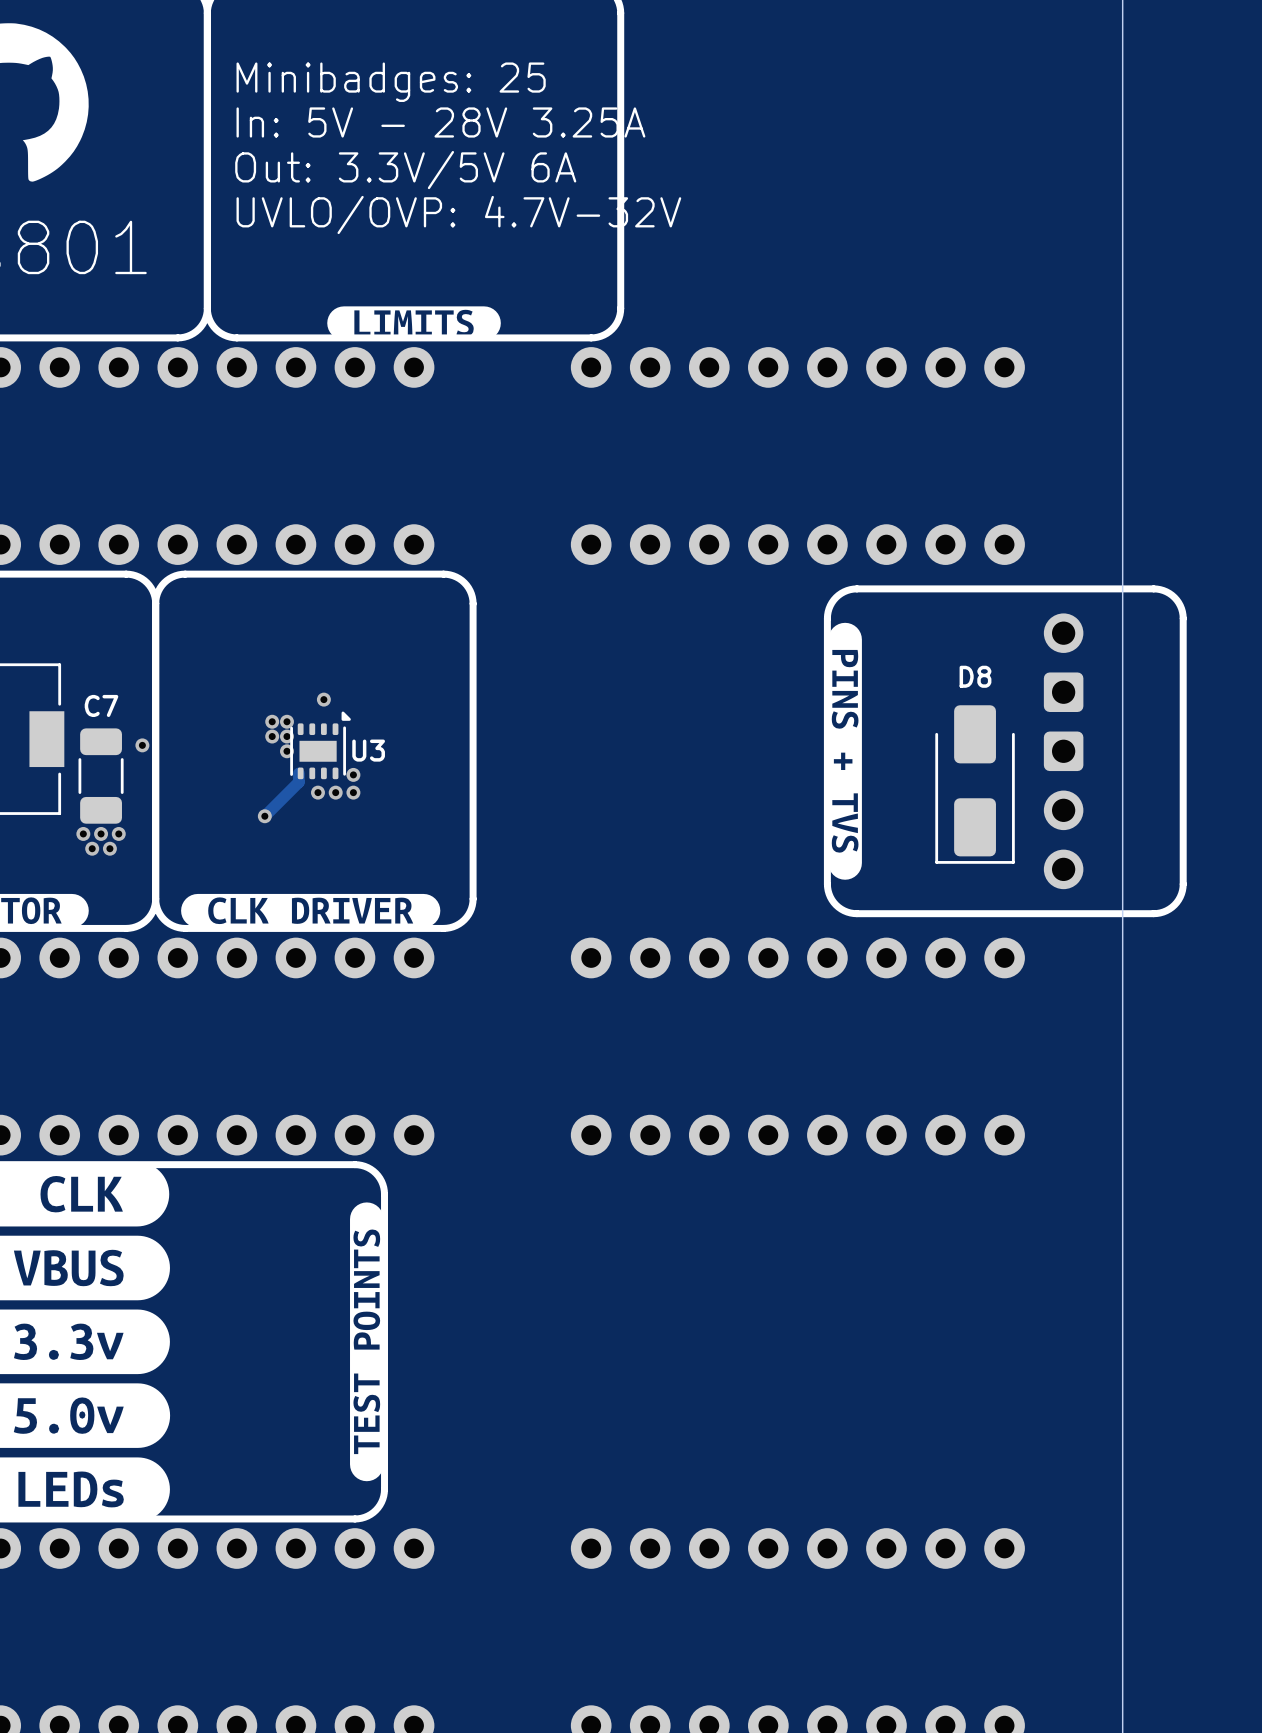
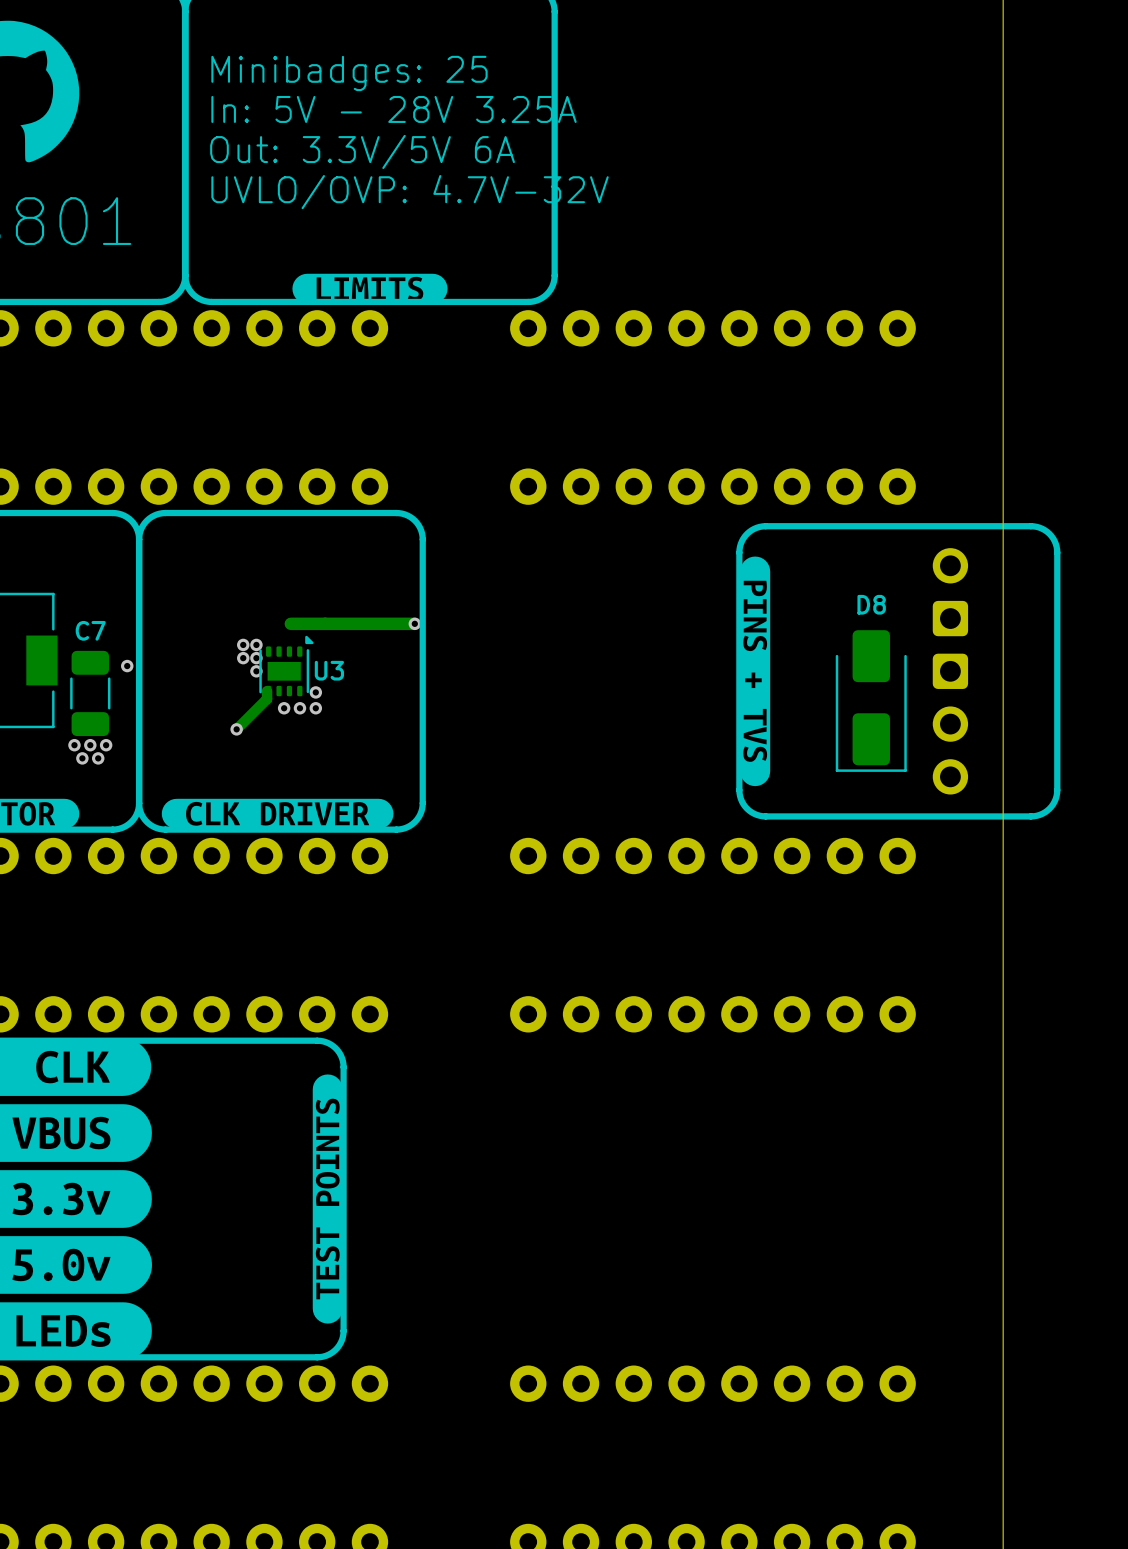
track: none -> (414, 623) (290, 623)
via: none -> (414, 623)
via: (323, 699) -> none

